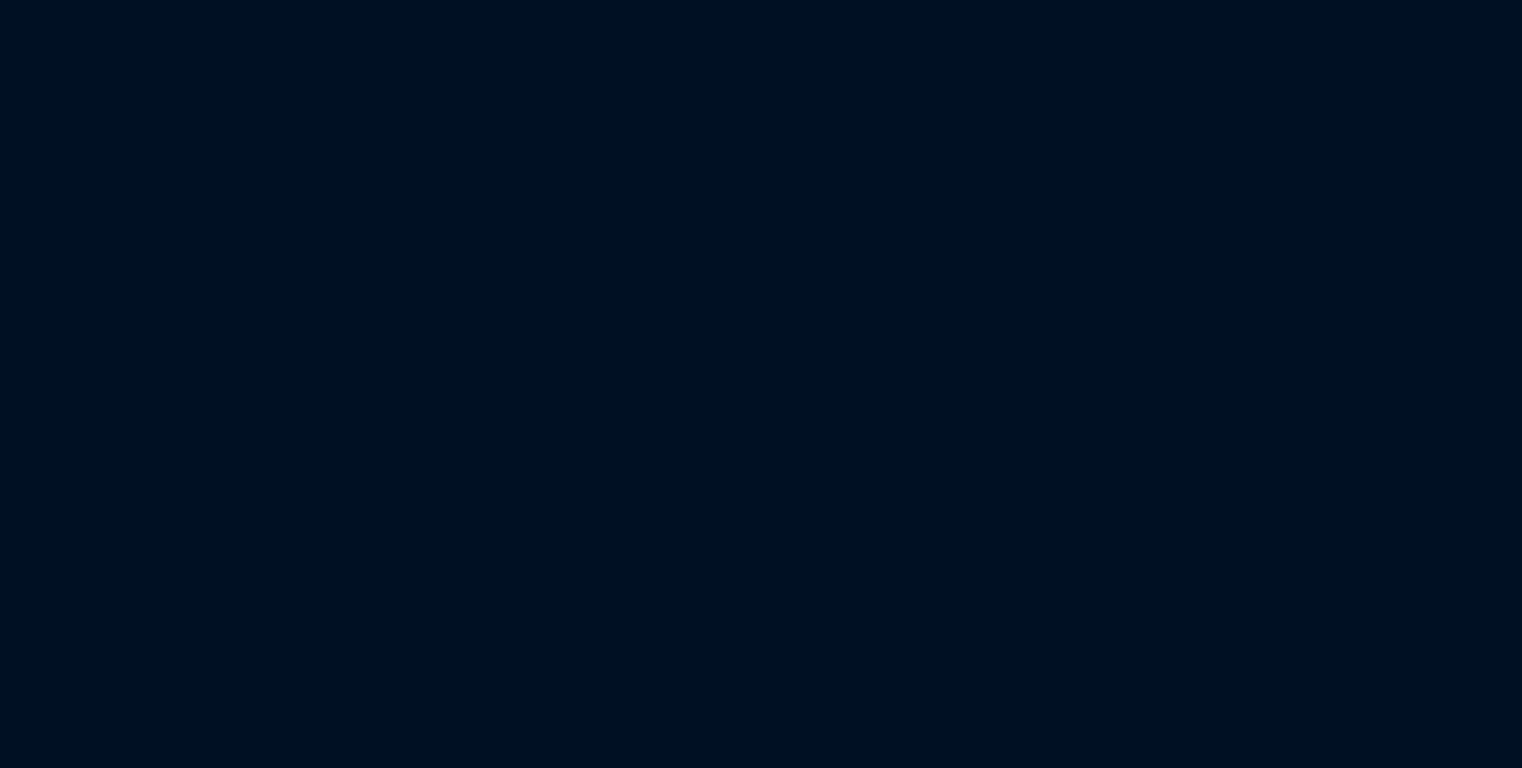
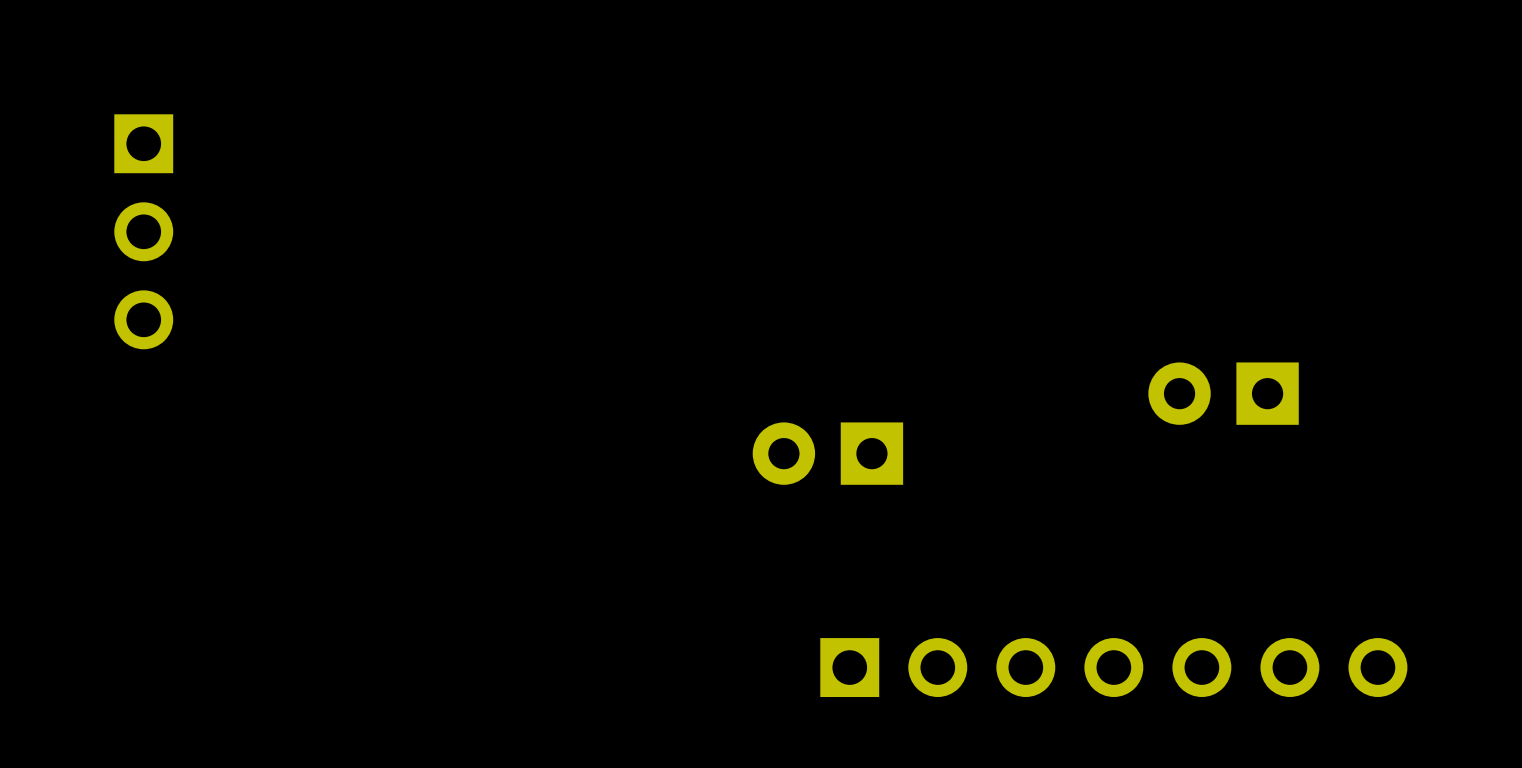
part: none -> (143, 231)
part: none -> (1223, 393)
part: none -> (827, 453)
part: none -> (1113, 667)

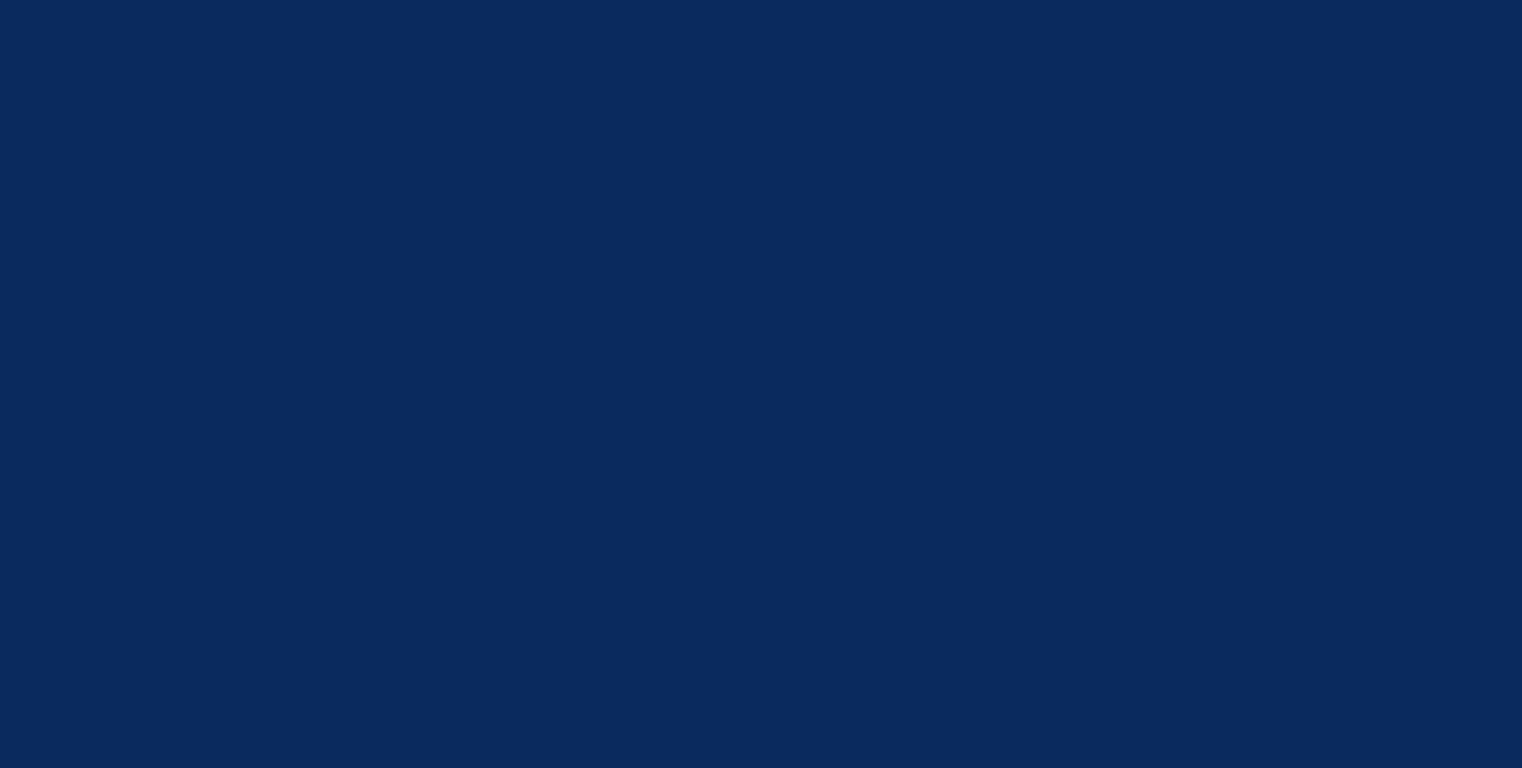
part: (143, 231) -> none
part: (1223, 393) -> none
part: (827, 453) -> none
part: (1113, 667) -> none

